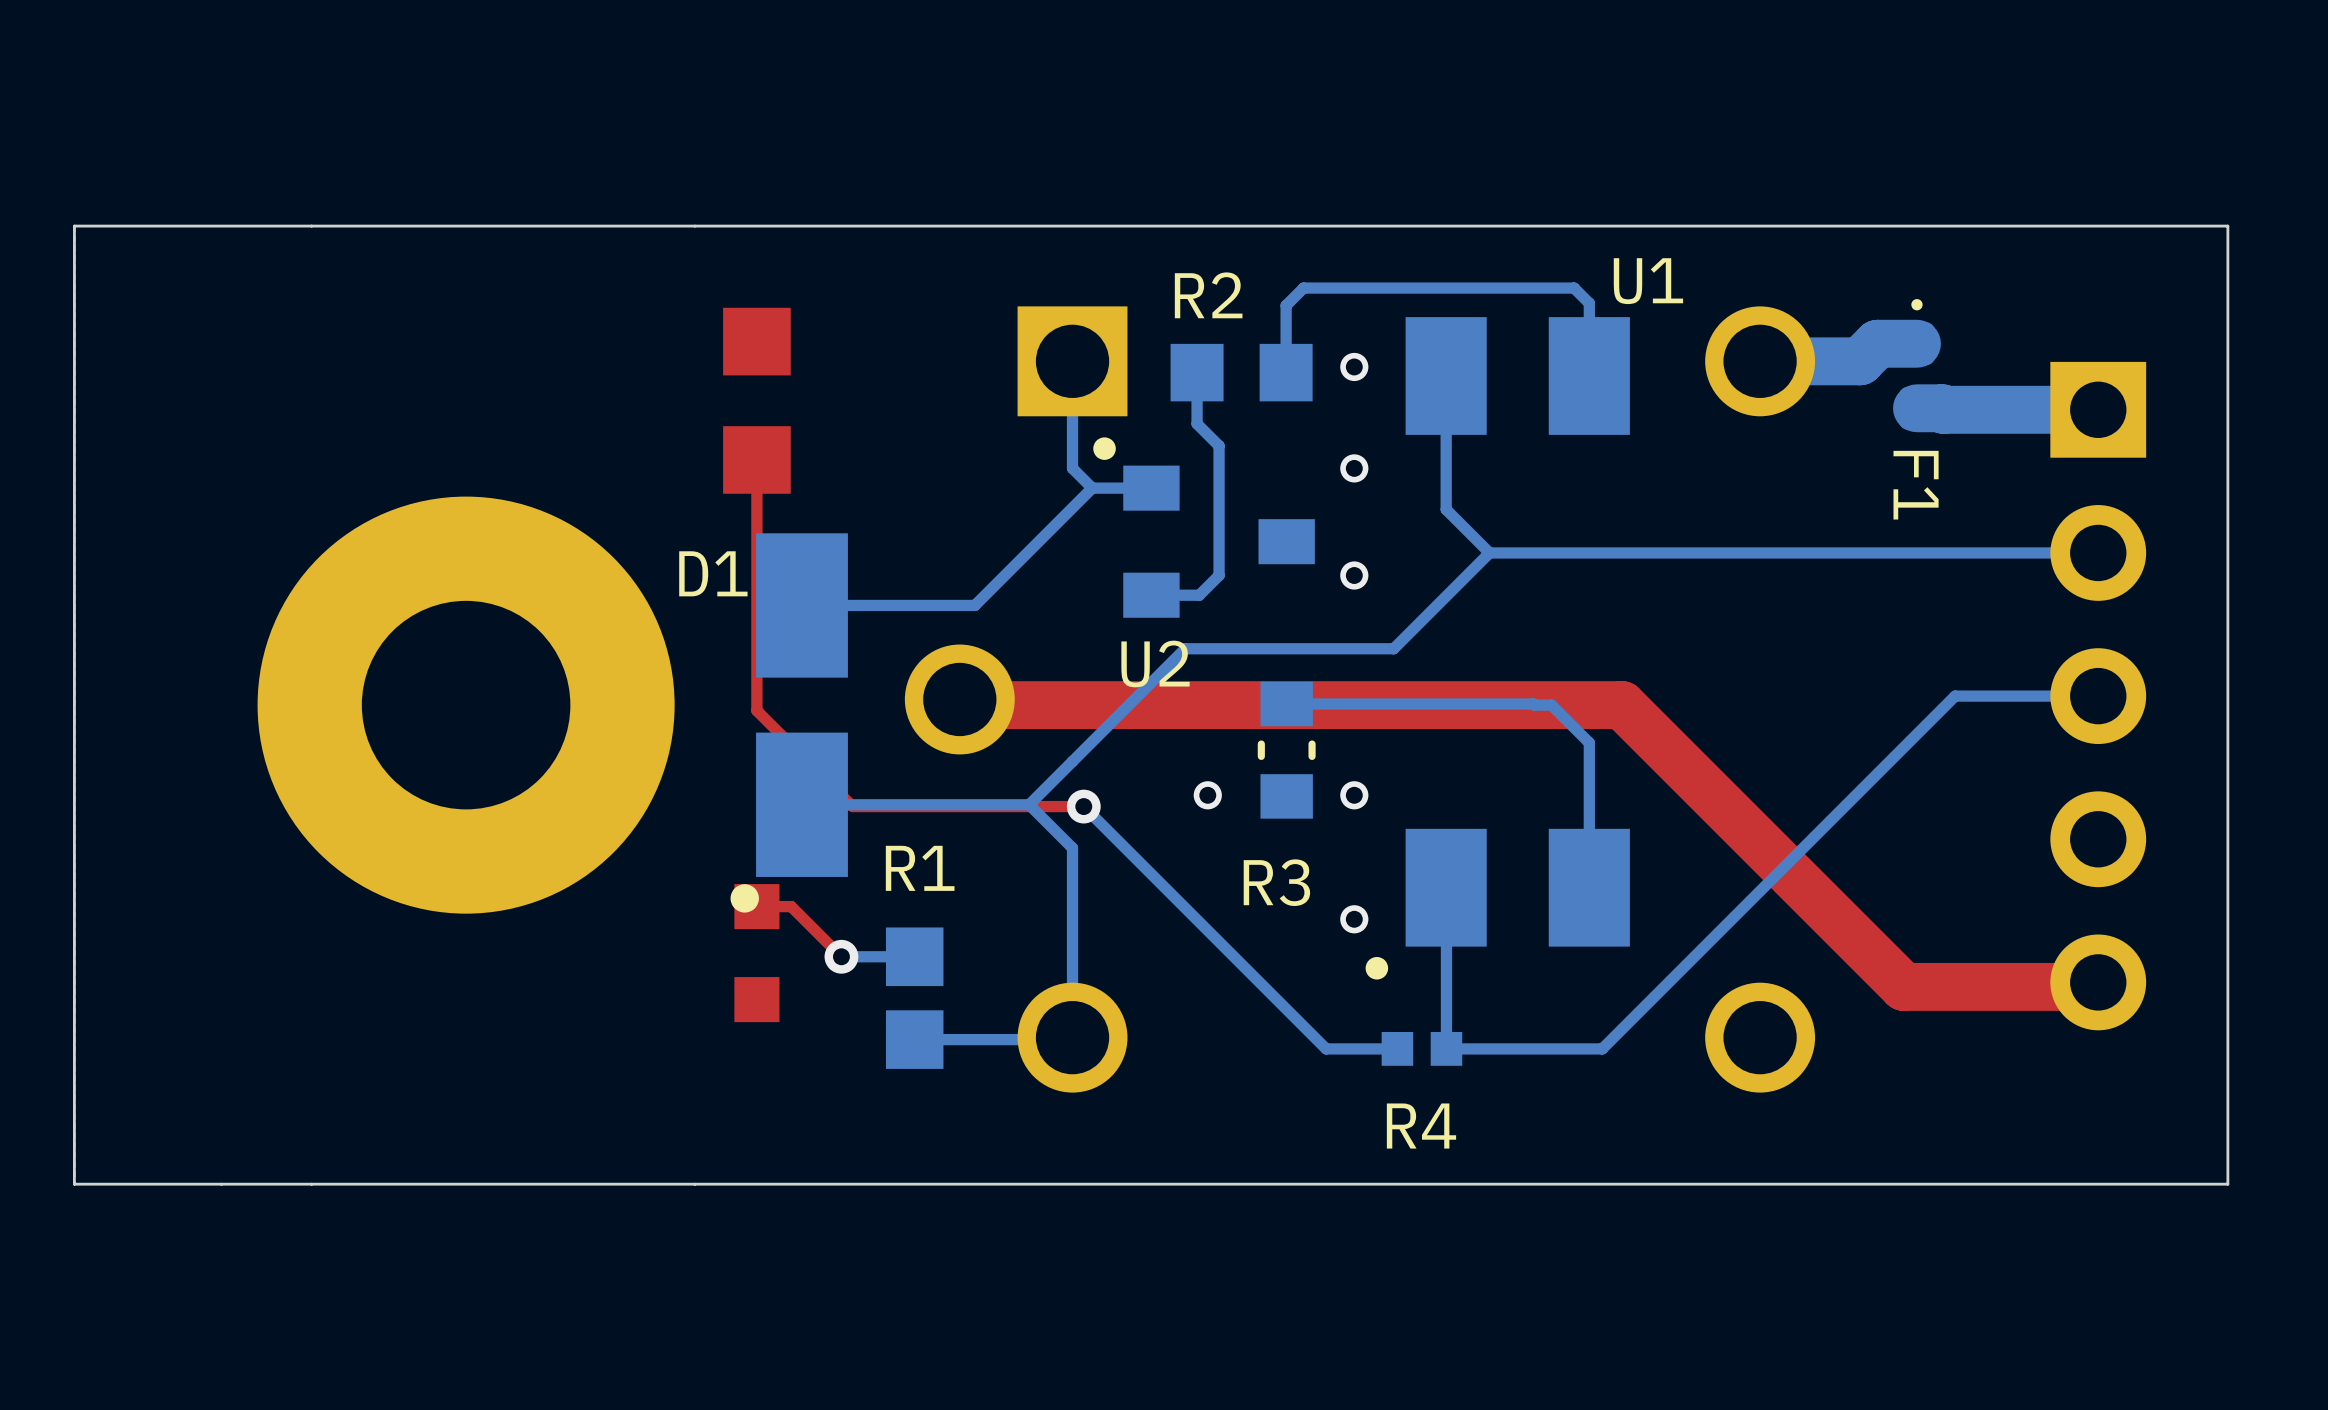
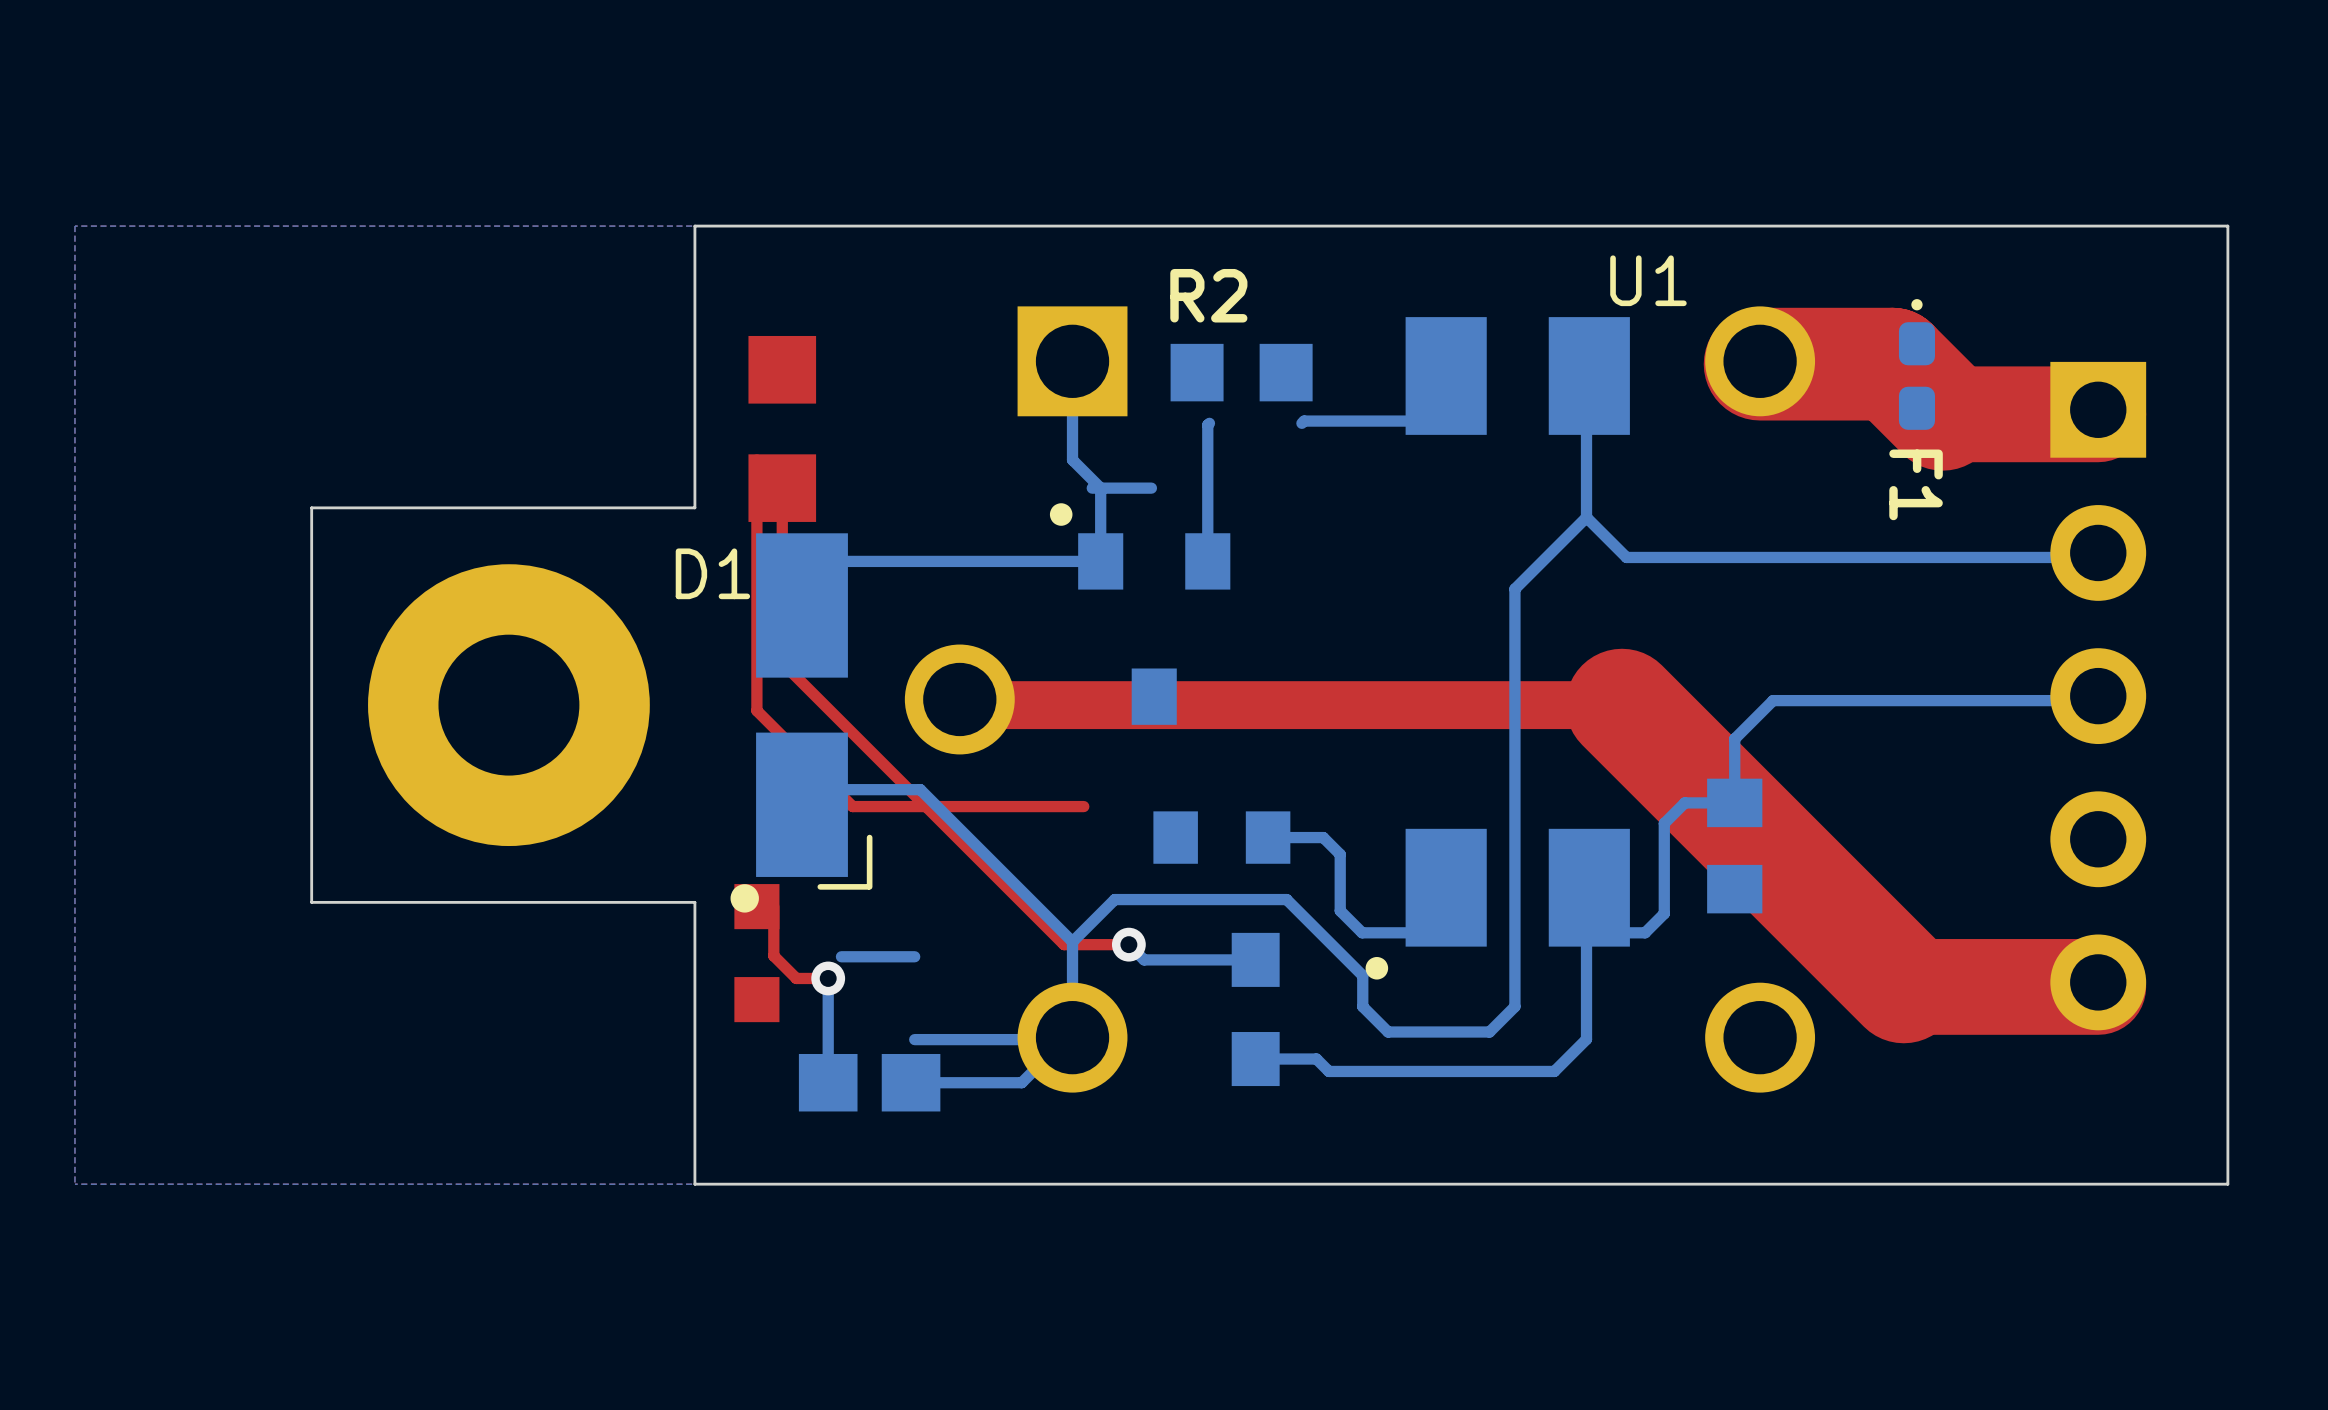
board edge: (694, 226) (74, 226) (74, 1184) (694, 1184) -> (694, 226) (694, 507) (311, 507) (311, 902) (694, 902) (694, 1184)
bottom track: (1916, 343) (1877, 343) (1860, 361) (1760, 361) -> none
top track: none -> (1760, 364) (1892, 364) (1942, 414) (2098, 414)
via: (1354, 366) -> none
bottom track: (1197, 372) (1197, 423) (1219, 445) (1219, 575) (1199, 595) (1151, 595) -> none
bottom track: (1286, 372) (1286, 305) (1303, 288) (1574, 288) (1589, 303) (1589, 375) -> none
bottom track: (1446, 375) (1446, 509) (1489, 552) -> none
part position: (756, 400) -> (782, 428)
bottom track: (1916, 408) (2098, 409) -> none
bottom track: none -> (1443, 421) (1304, 421) (1301, 423)
bottom track: none -> (1586, 421) (1586, 517)
bottom track: none -> (1209, 423) (1207, 425) (1207, 561)
bottom track: (1072, 459) (1072, 468) (1092, 488) (974, 605) (802, 605) -> (1072, 459) (1100, 488) (1100, 561) (802, 561) (799, 564)
via: (1354, 468) -> none
top track: none -> (782, 488) (782, 662) (1064, 944) (1128, 944)
part footprint: [257, 496, 675, 914] -> [368, 564, 650, 847]
bottom track: none -> (1586, 517) (1514, 589) (1514, 1006) (1489, 1032) (1388, 1032) (1362, 1006) (1362, 975) (1286, 899) (1114, 899) (1072, 941) (920, 789) (799, 789)
bottom track: none -> (1586, 517) (1626, 557) (2098, 557)
U2 side: bottom (1204, 527) -> top (1140, 614)
bottom track: (1489, 552) (1393, 648) (1185, 648) (1029, 804) -> none
bottom track: (2098, 552) (1489, 552) -> none
via: (1354, 575) -> none
bottom track: (2098, 696) (1955, 696) (1602, 1048) (1446, 1048) (1446, 887) -> none
bottom track: none -> (2098, 700) (1773, 700) (1734, 738) (1734, 802) (1684, 802) (1664, 823) (1664, 913) (1645, 932) (1586, 932) (1586, 1039) (1554, 1071) (1328, 1071) (1316, 1059) (1255, 1059)
bottom track: (1282, 704) (1551, 705) (1589, 742) (1589, 887) -> none
top track width: thin (1622, 705) (1903, 986) (2098, 986) -> thick (1622, 705) (1903, 986) (2098, 986)
R3 side: bottom (1286, 750) -> top (1221, 837)
via: (1207, 795) -> none
via: (1354, 795) -> none
bottom track: (1029, 804) (1072, 848) (1072, 941) -> none
bottom track: (1029, 804) (802, 804) -> none
bottom track: (1083, 806) (1326, 1048) (1397, 1048) -> none
via: (1083, 806) -> none
line: none -> (869, 837) (869, 886)
bottom track: none -> (1268, 837) (1323, 837) (1340, 854) (1340, 910) (1362, 932) (1443, 932)
part: none -> (1734, 846)
line: none -> (868, 886) (820, 886)
top track: (756, 906) (791, 906) (841, 956) -> none
top track: none -> (773, 906) (773, 955) (796, 978) (828, 978)
via: (1354, 919) -> none
bottom track: none -> (1128, 944) (1144, 959) (1255, 959)
via: none -> (1128, 944)
via position: (841, 956) -> (828, 978)
bottom track: none -> (828, 978) (828, 1082)
R1 side: bottom (914, 998) -> top (869, 1082)
part: none -> (1255, 1009)
bottom track: none -> (1064, 1040) (1021, 1082) (911, 1082)
R4: (1421, 1048) -> none

